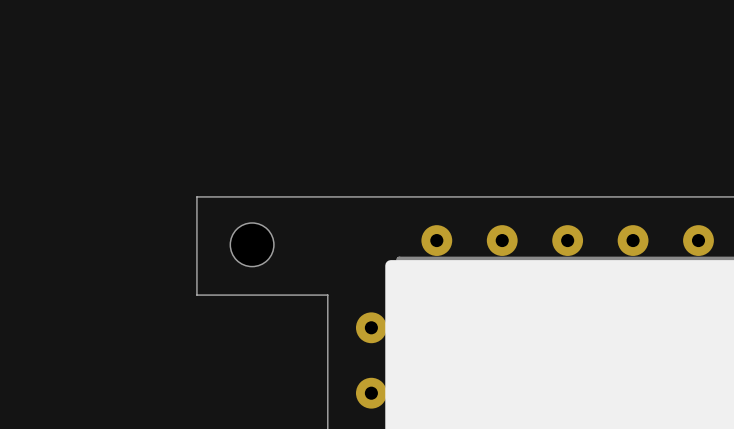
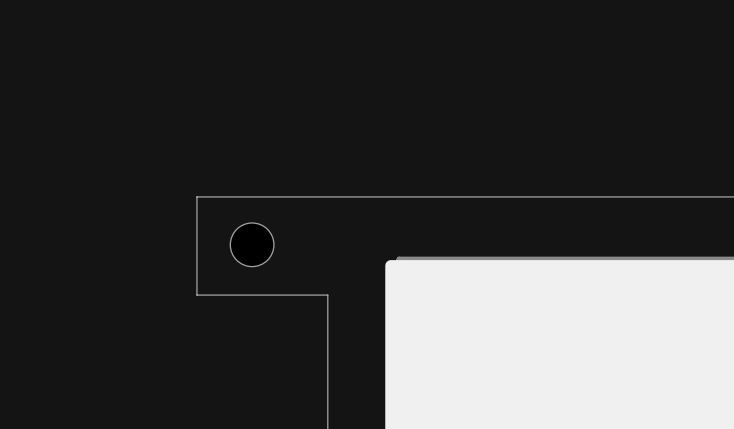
via: (436, 240) -> none
via: (502, 240) -> none
via: (567, 240) -> none
via: (633, 240) -> none
via: (698, 240) -> none
via: (371, 327) -> none
via: (371, 393) -> none

